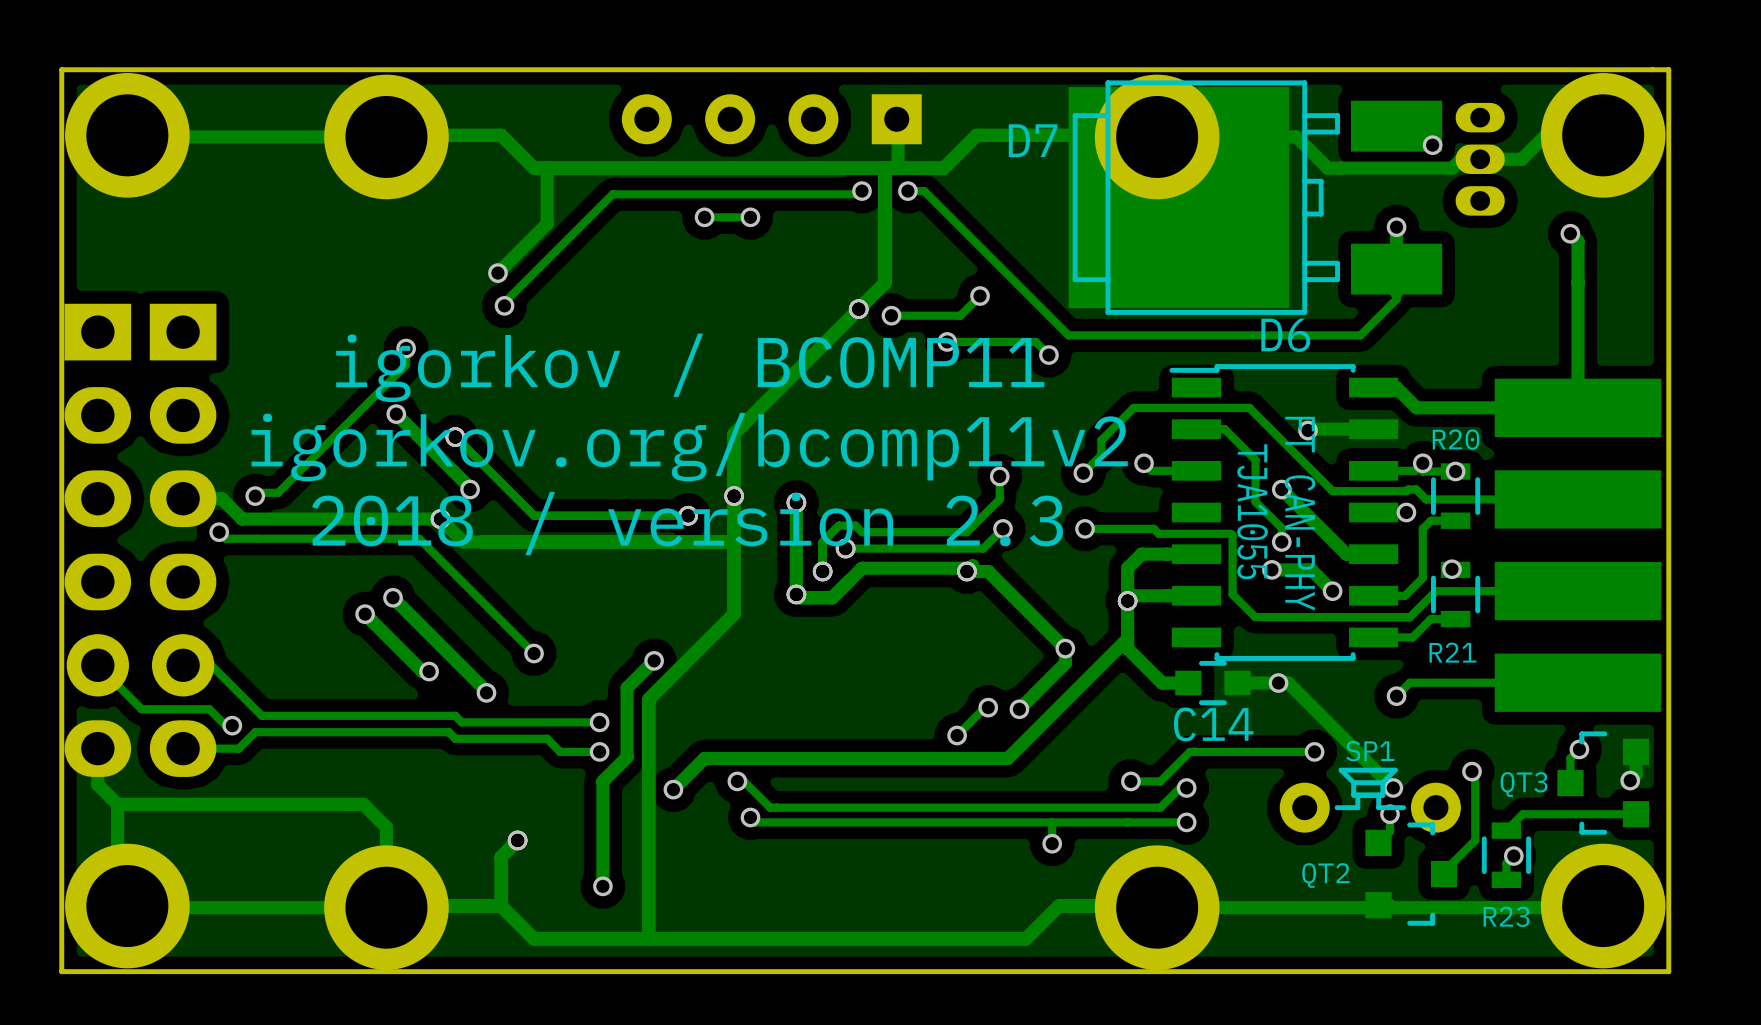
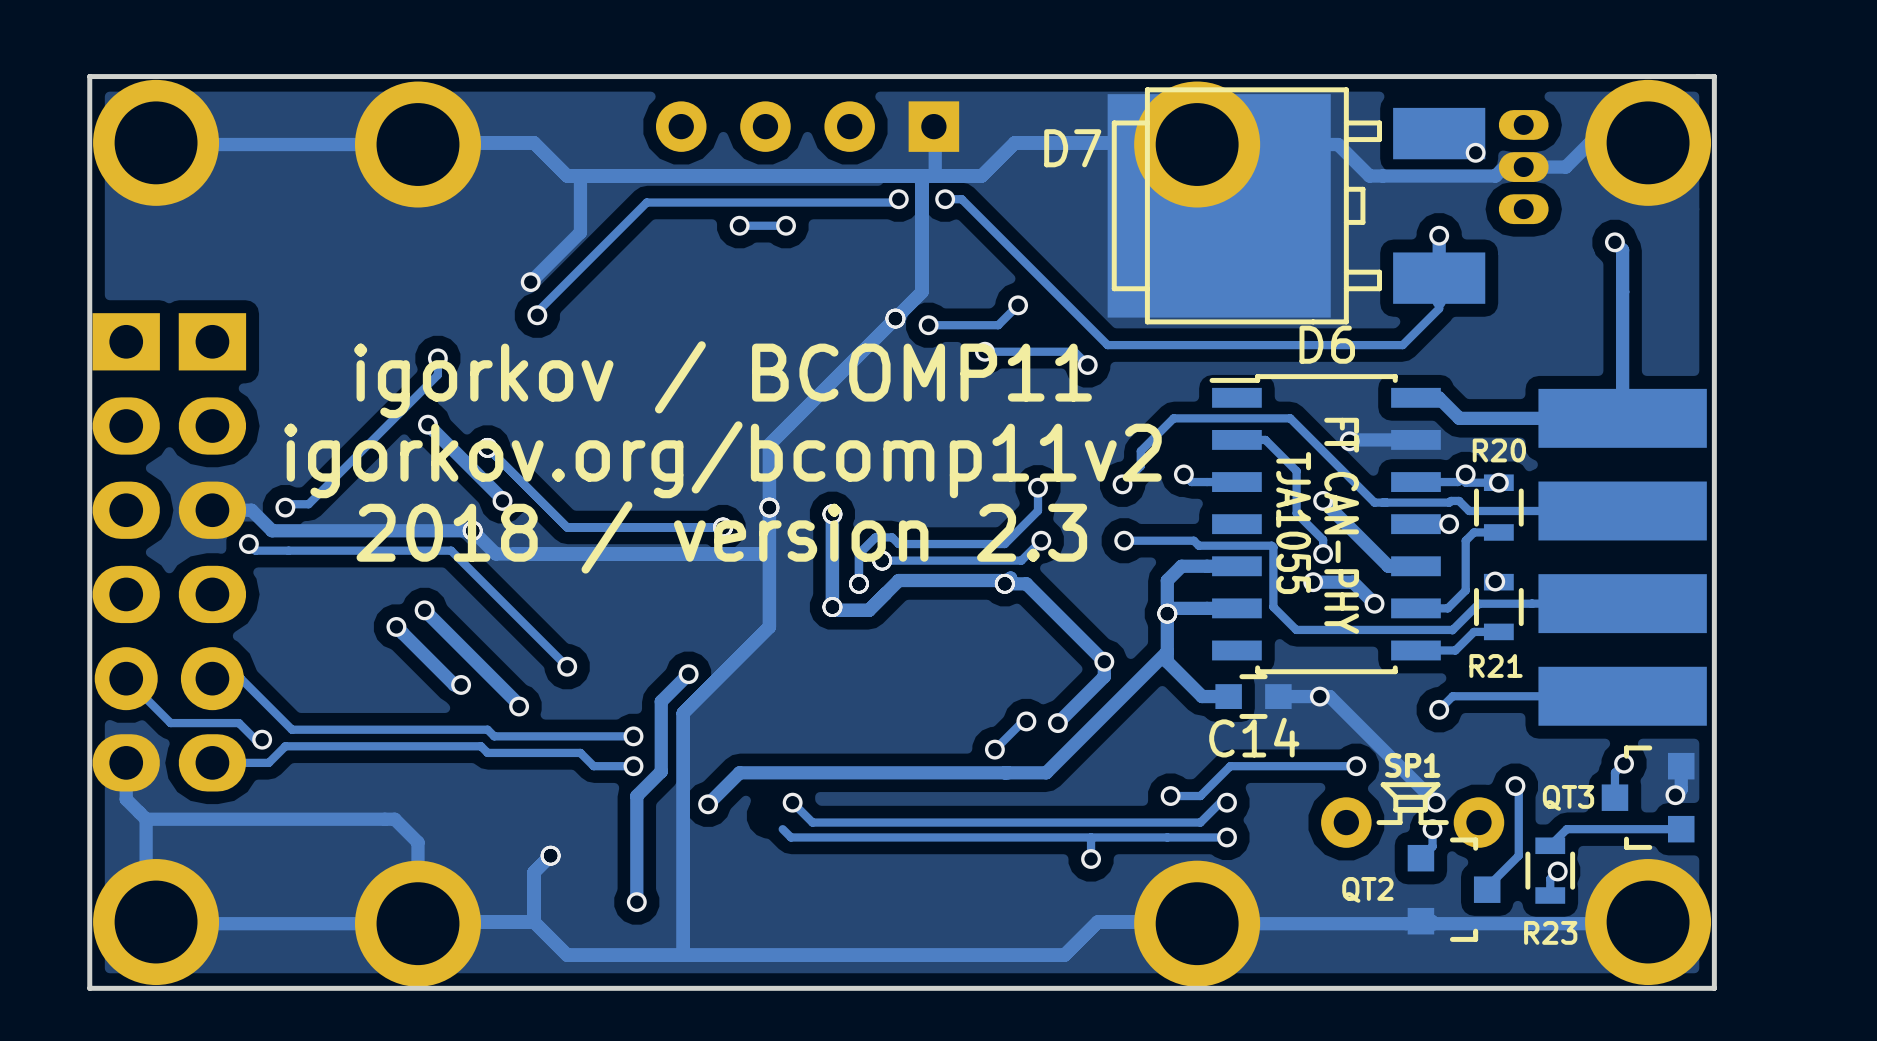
track: (737, 781) (743, 781) (770, 807) (776, 807) -> (792, 802) (812, 822)
via position: (737, 781) -> (792, 802)
via: (750, 817) -> none

